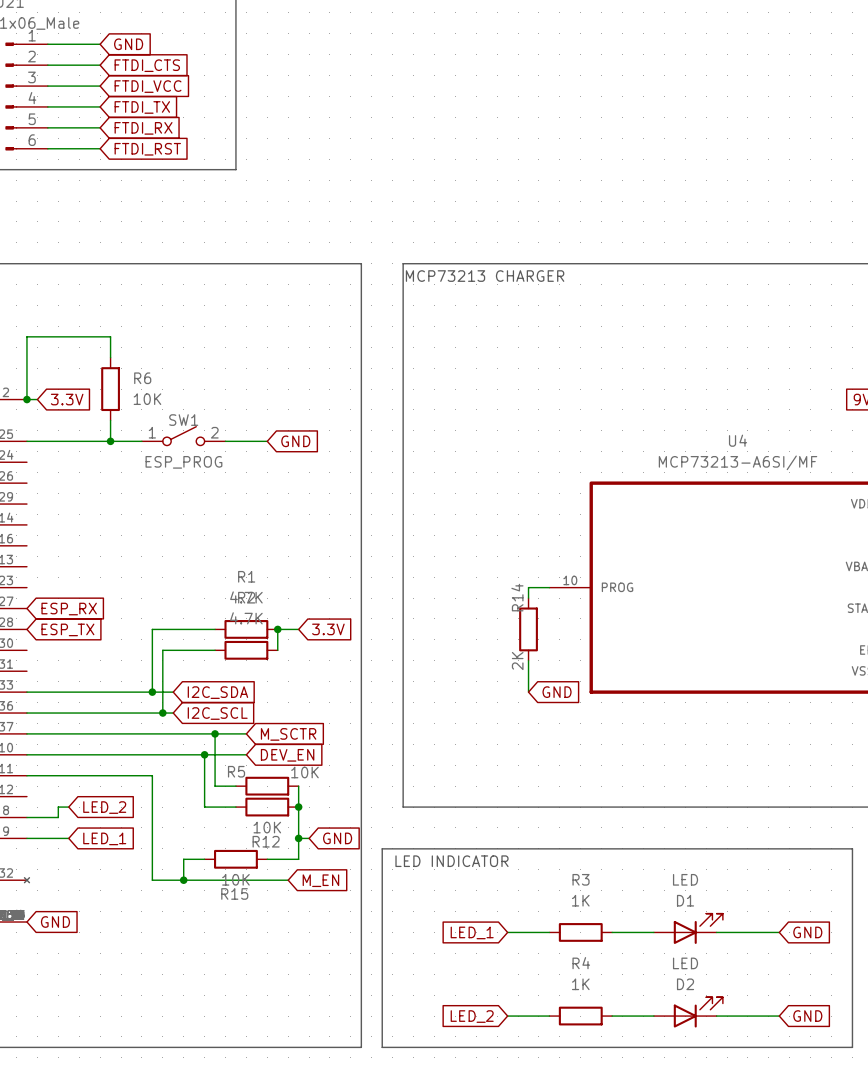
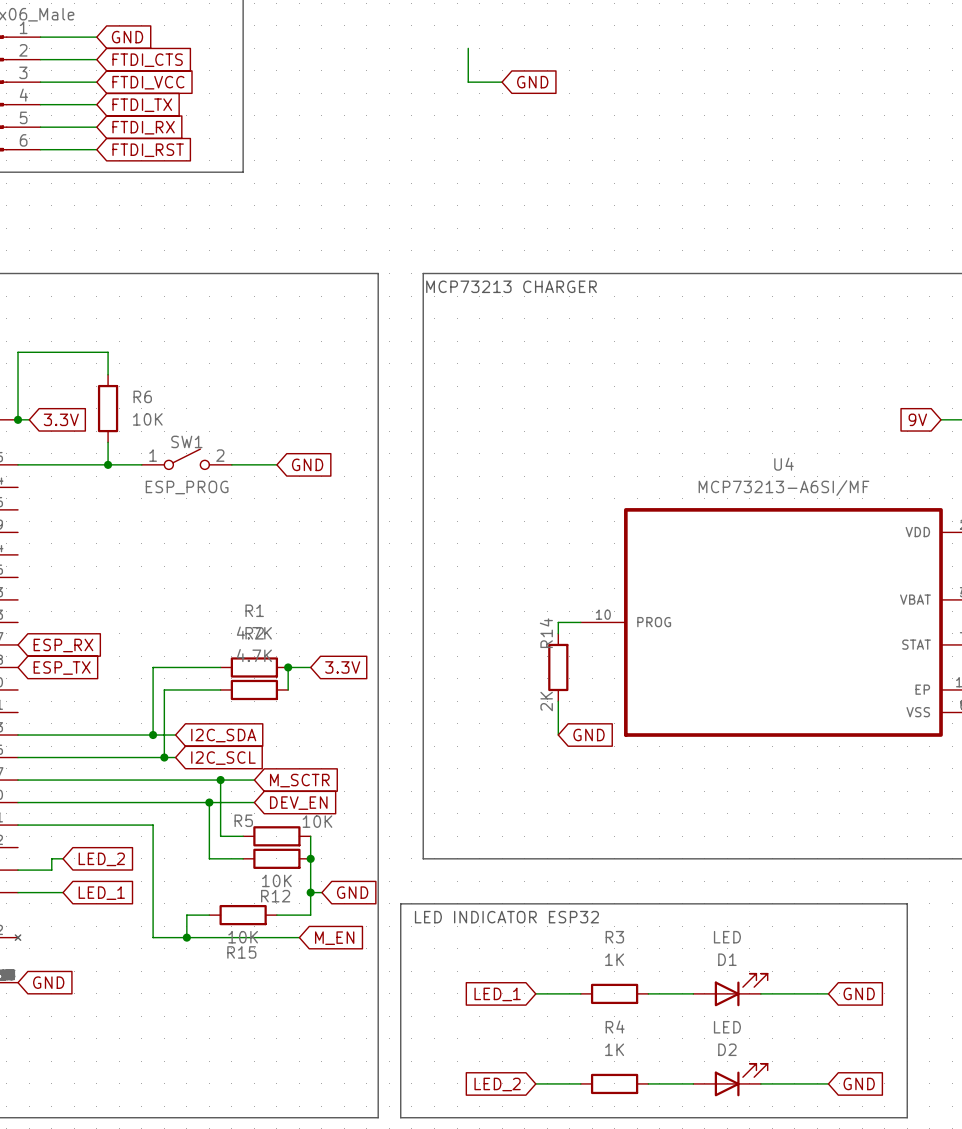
wire: none -> (468, 48) (468, 82) (502, 82)
global label: none -> GND (532, 82)
text: LED INDICATOR (451, 861) -> LED INDICATOR ESP32 (506, 917)

